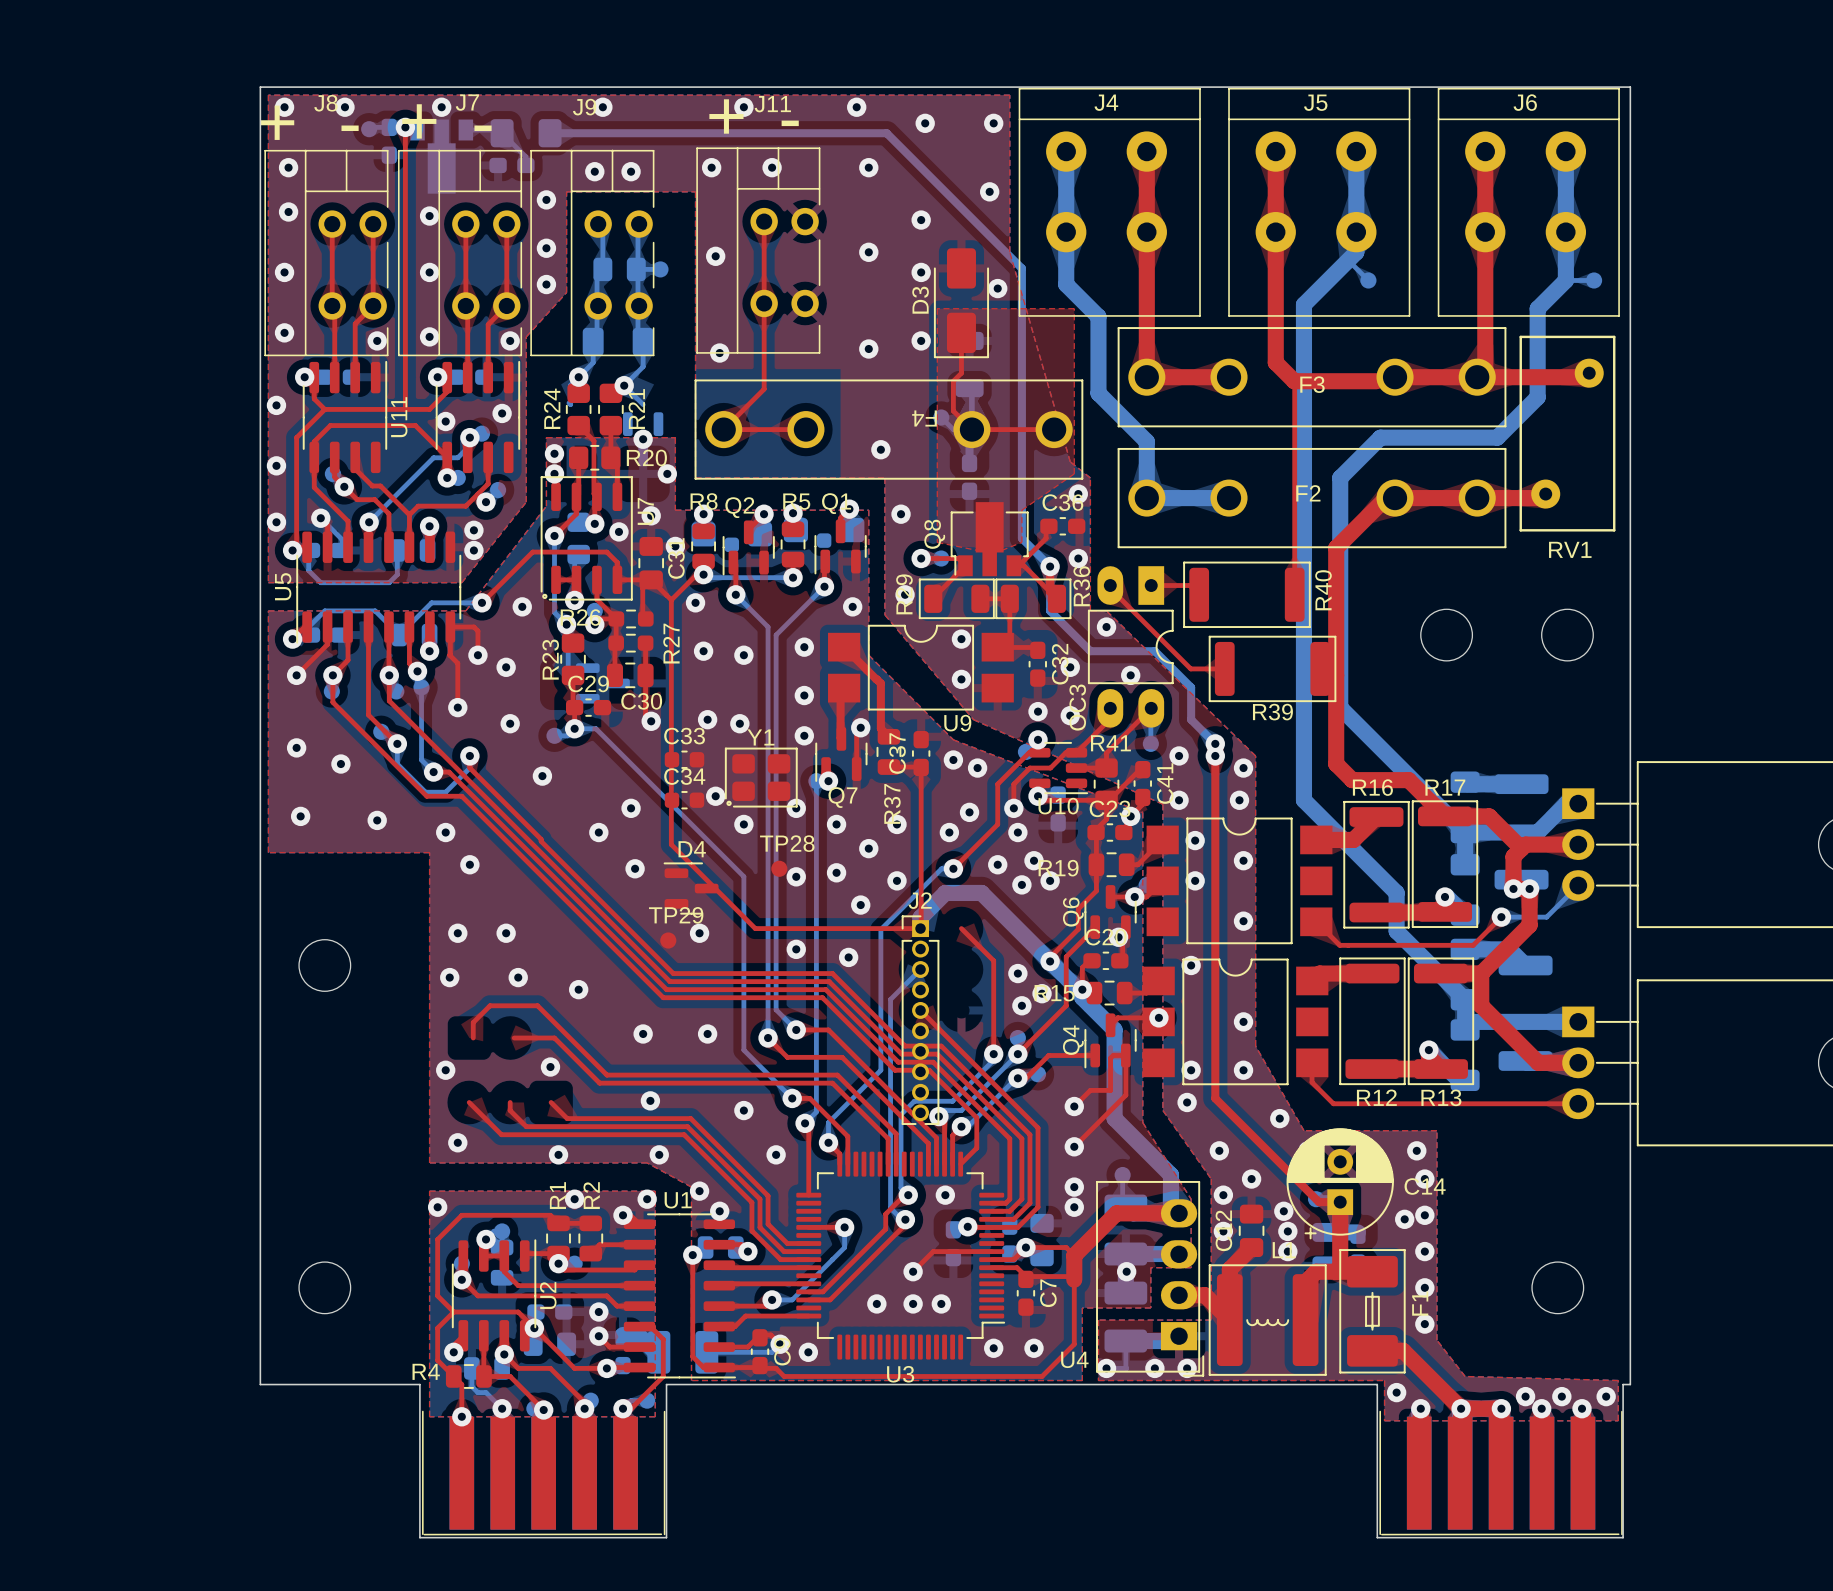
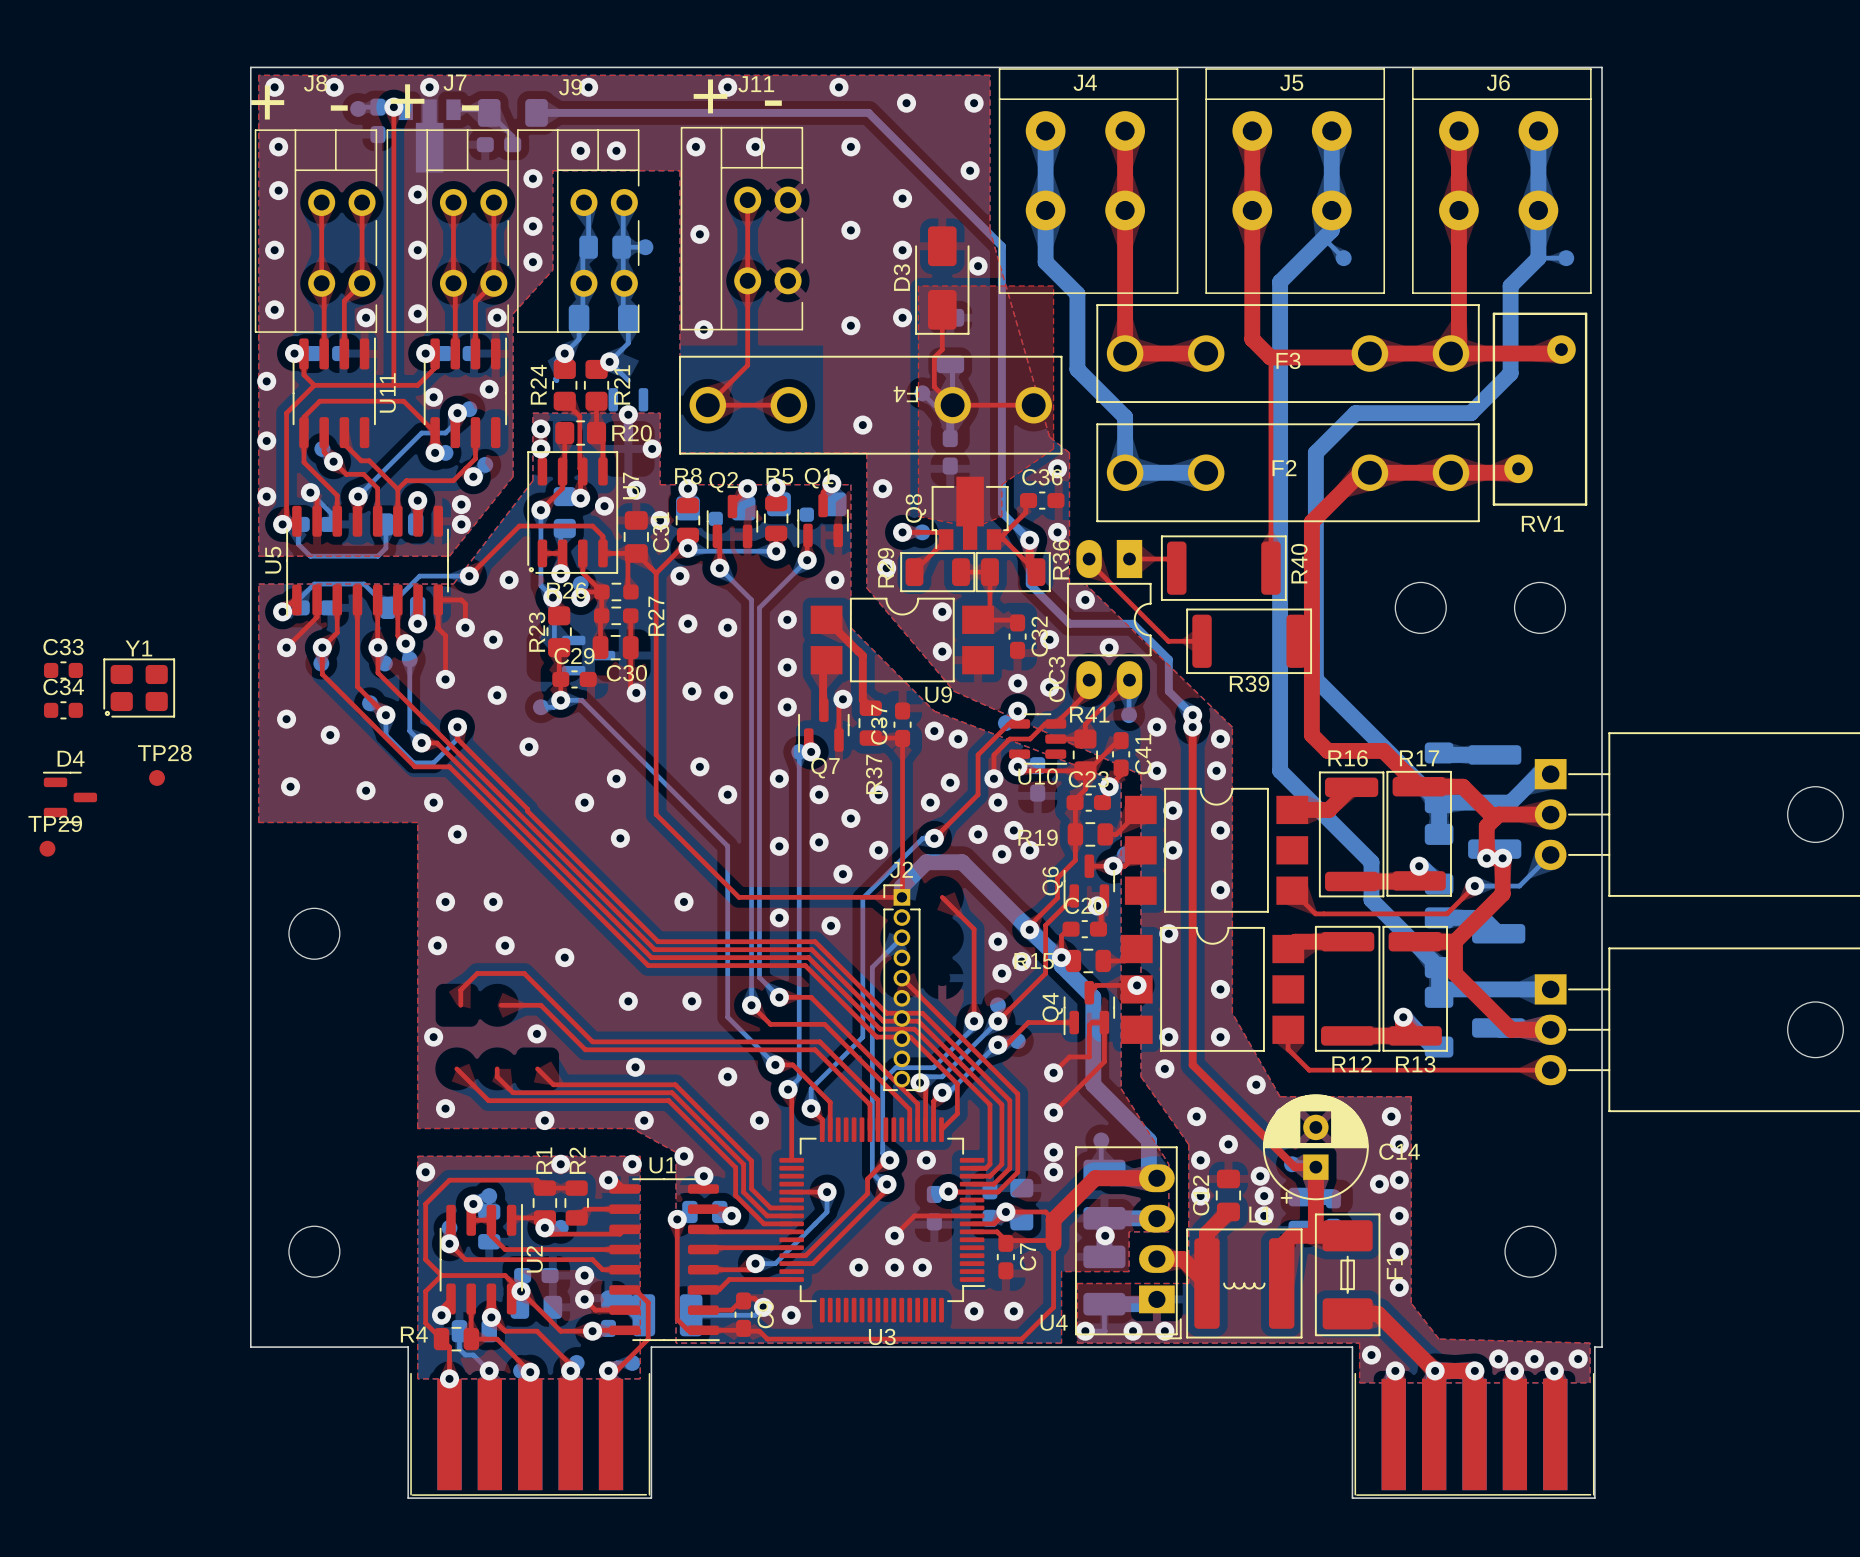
C33 position: (684, 759) -> (63, 670)
Y1 position: (761, 777) -> (139, 688)
C34 position: (684, 800) -> (63, 710)
TP28 position: (779, 868) -> (157, 777)
D4 position: (691, 888) -> (69, 797)
TP29 position: (668, 940) -> (47, 848)

